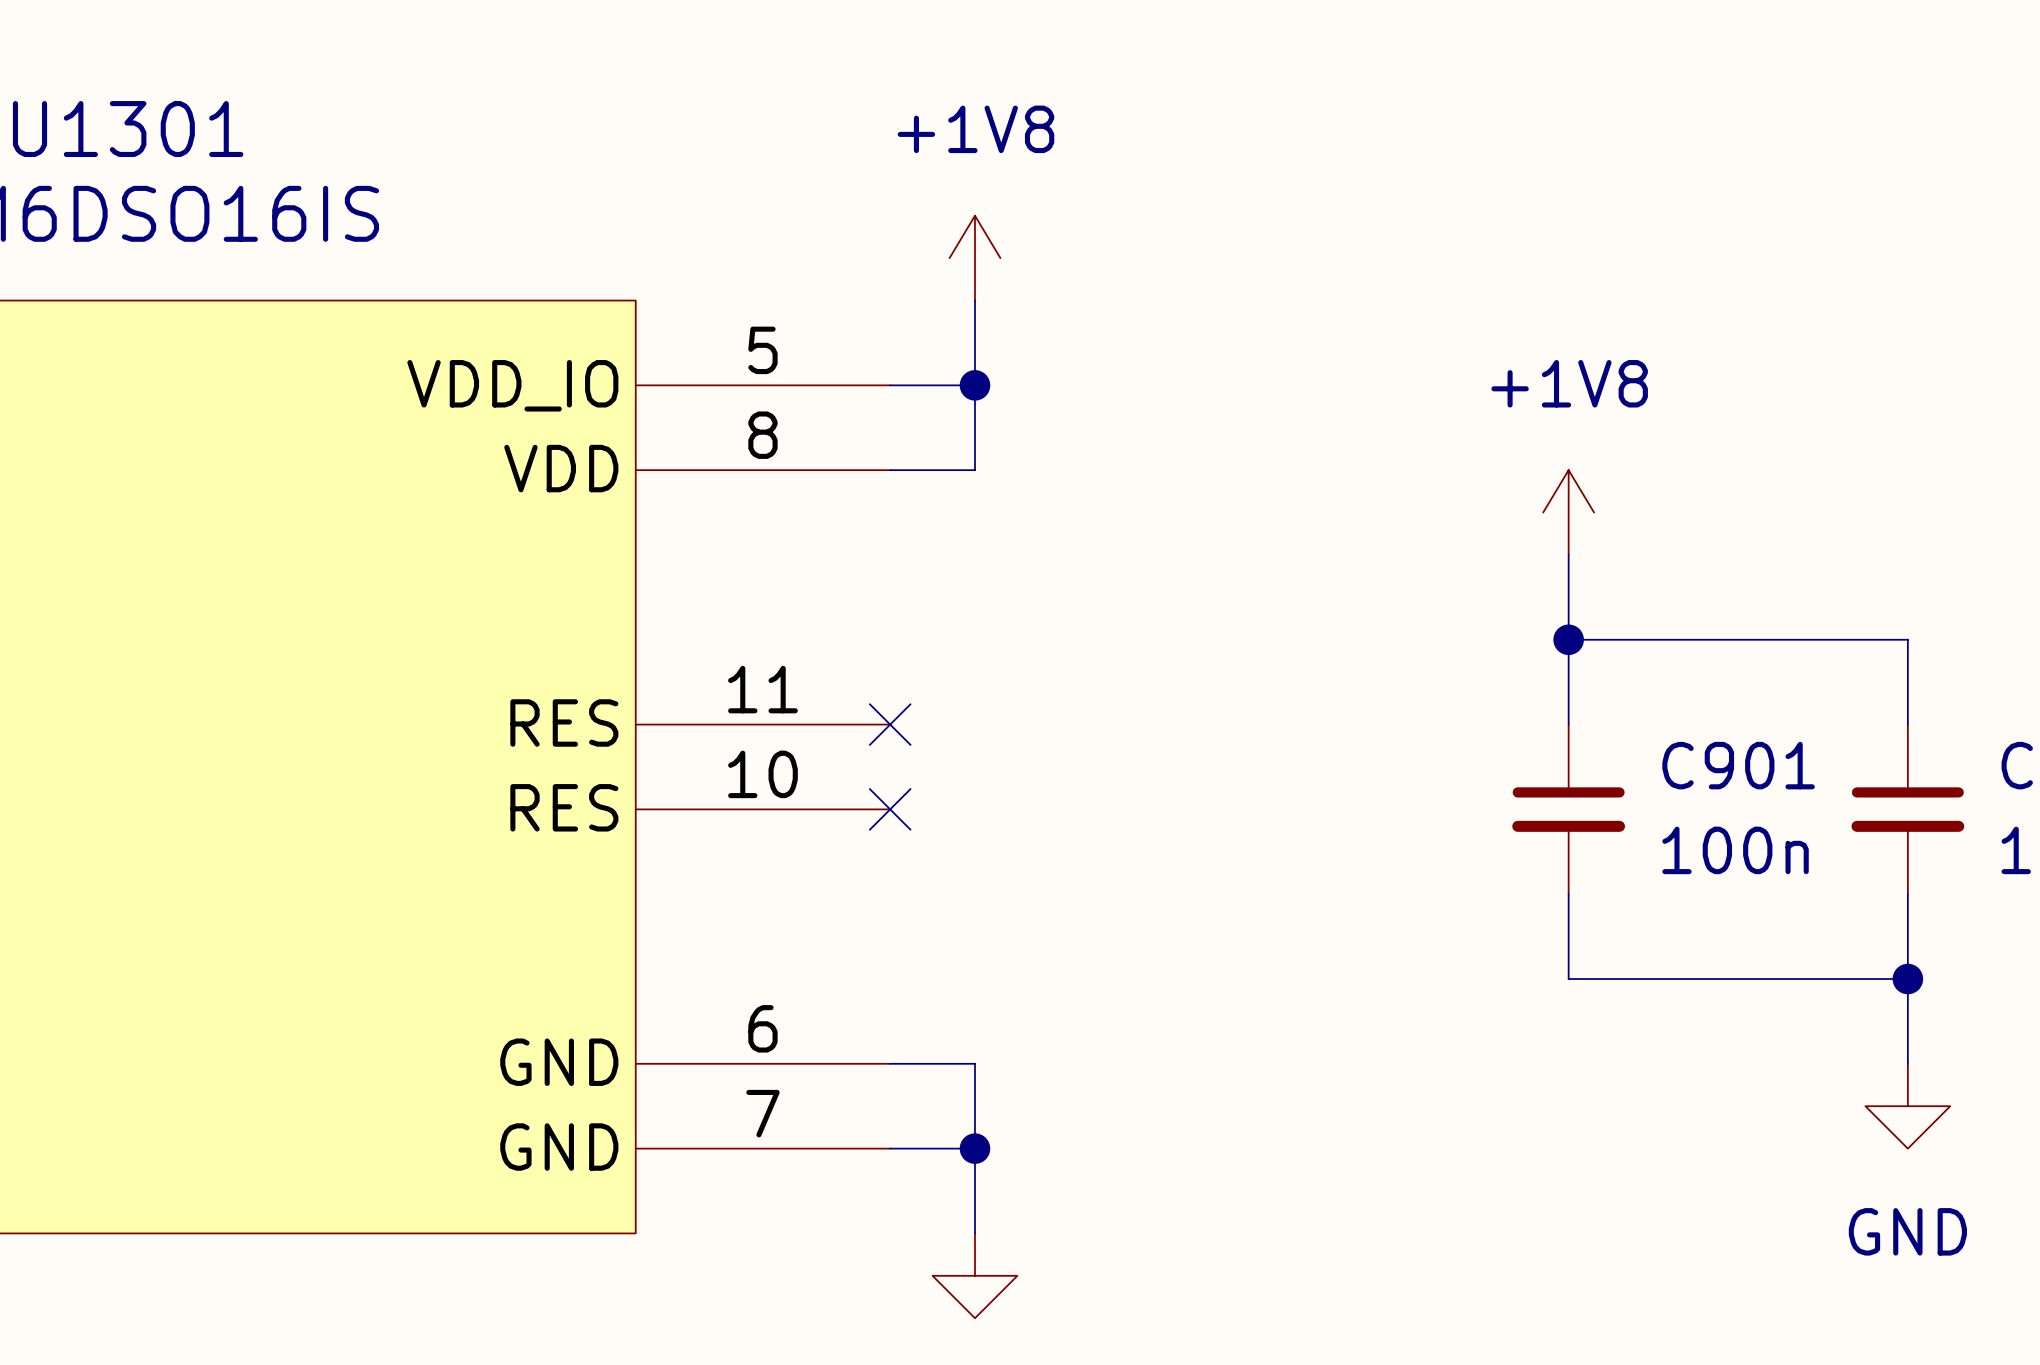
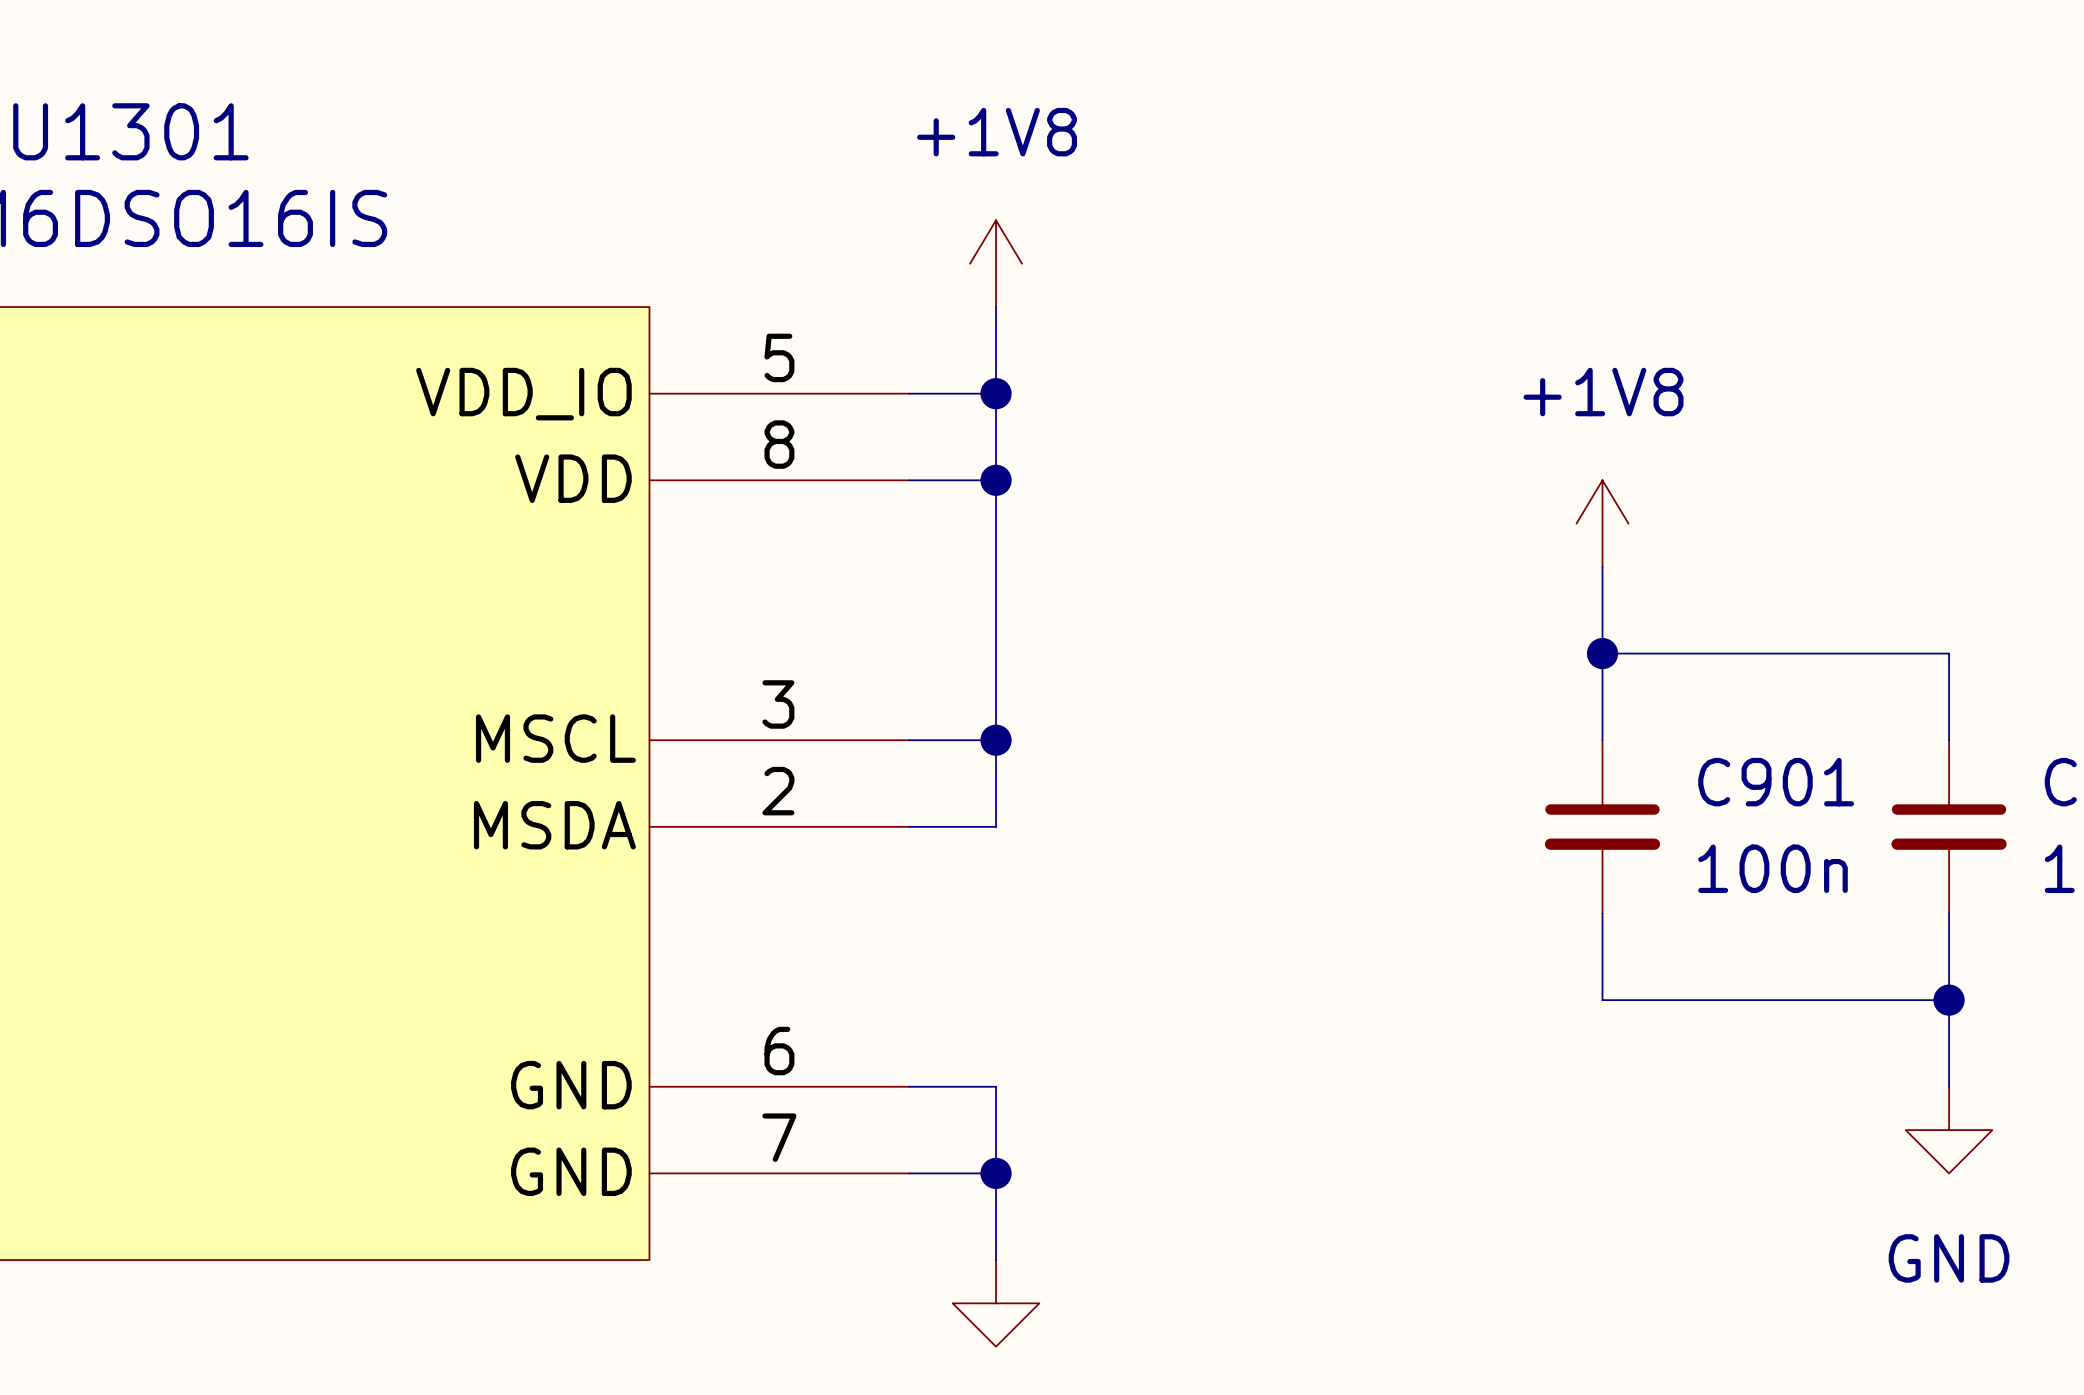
wire: none -> (996, 480) (996, 826) (909, 826)
junction: none -> (996, 480)
U1301 pin number: 11 (762, 689) -> 3 (778, 704)
U1301 pin name: RES (564, 722) -> MSCL (555, 738)
wire: none -> (909, 740) (996, 740)
no-connect mark: (890, 724) -> none
junction: none -> (996, 740)
U1301 pin number: 10 (762, 774) -> 2 (778, 791)
U1301 pin name: RES (564, 807) -> MSDA (554, 825)
no-connect mark: (890, 809) -> none

